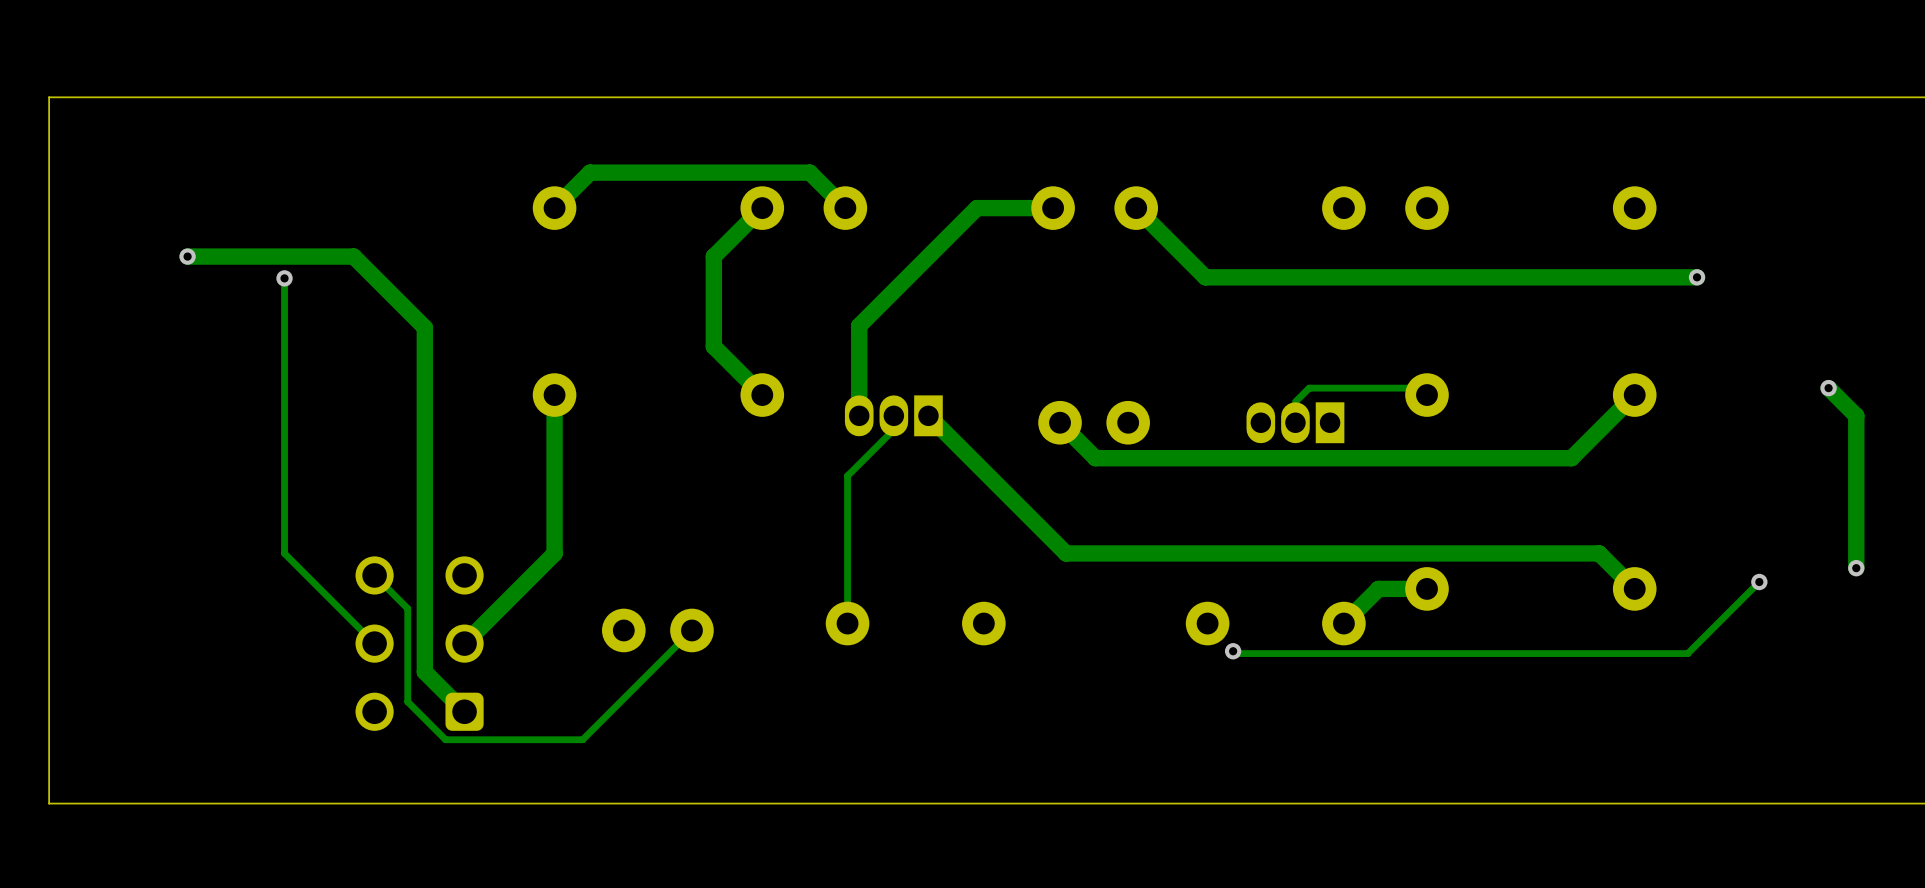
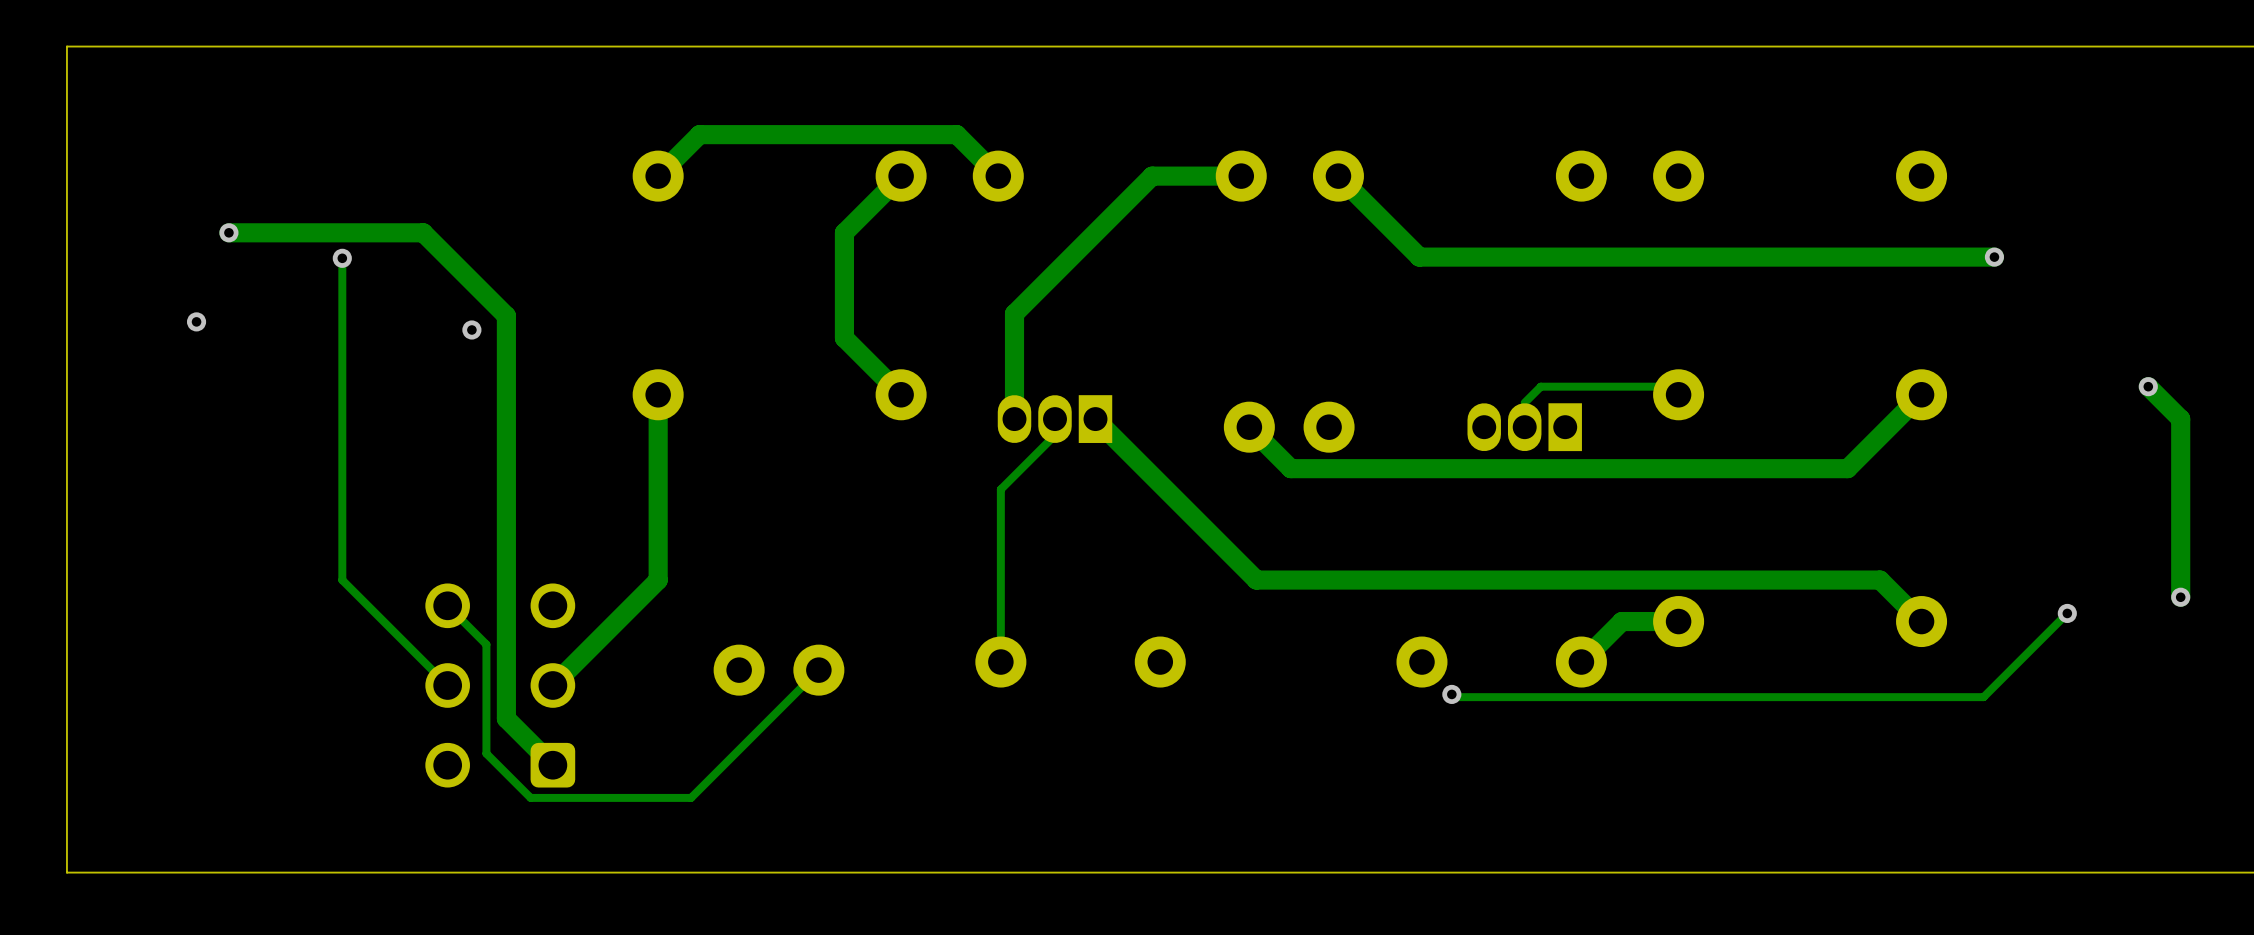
via: none -> (196, 321)
via: none -> (471, 329)

